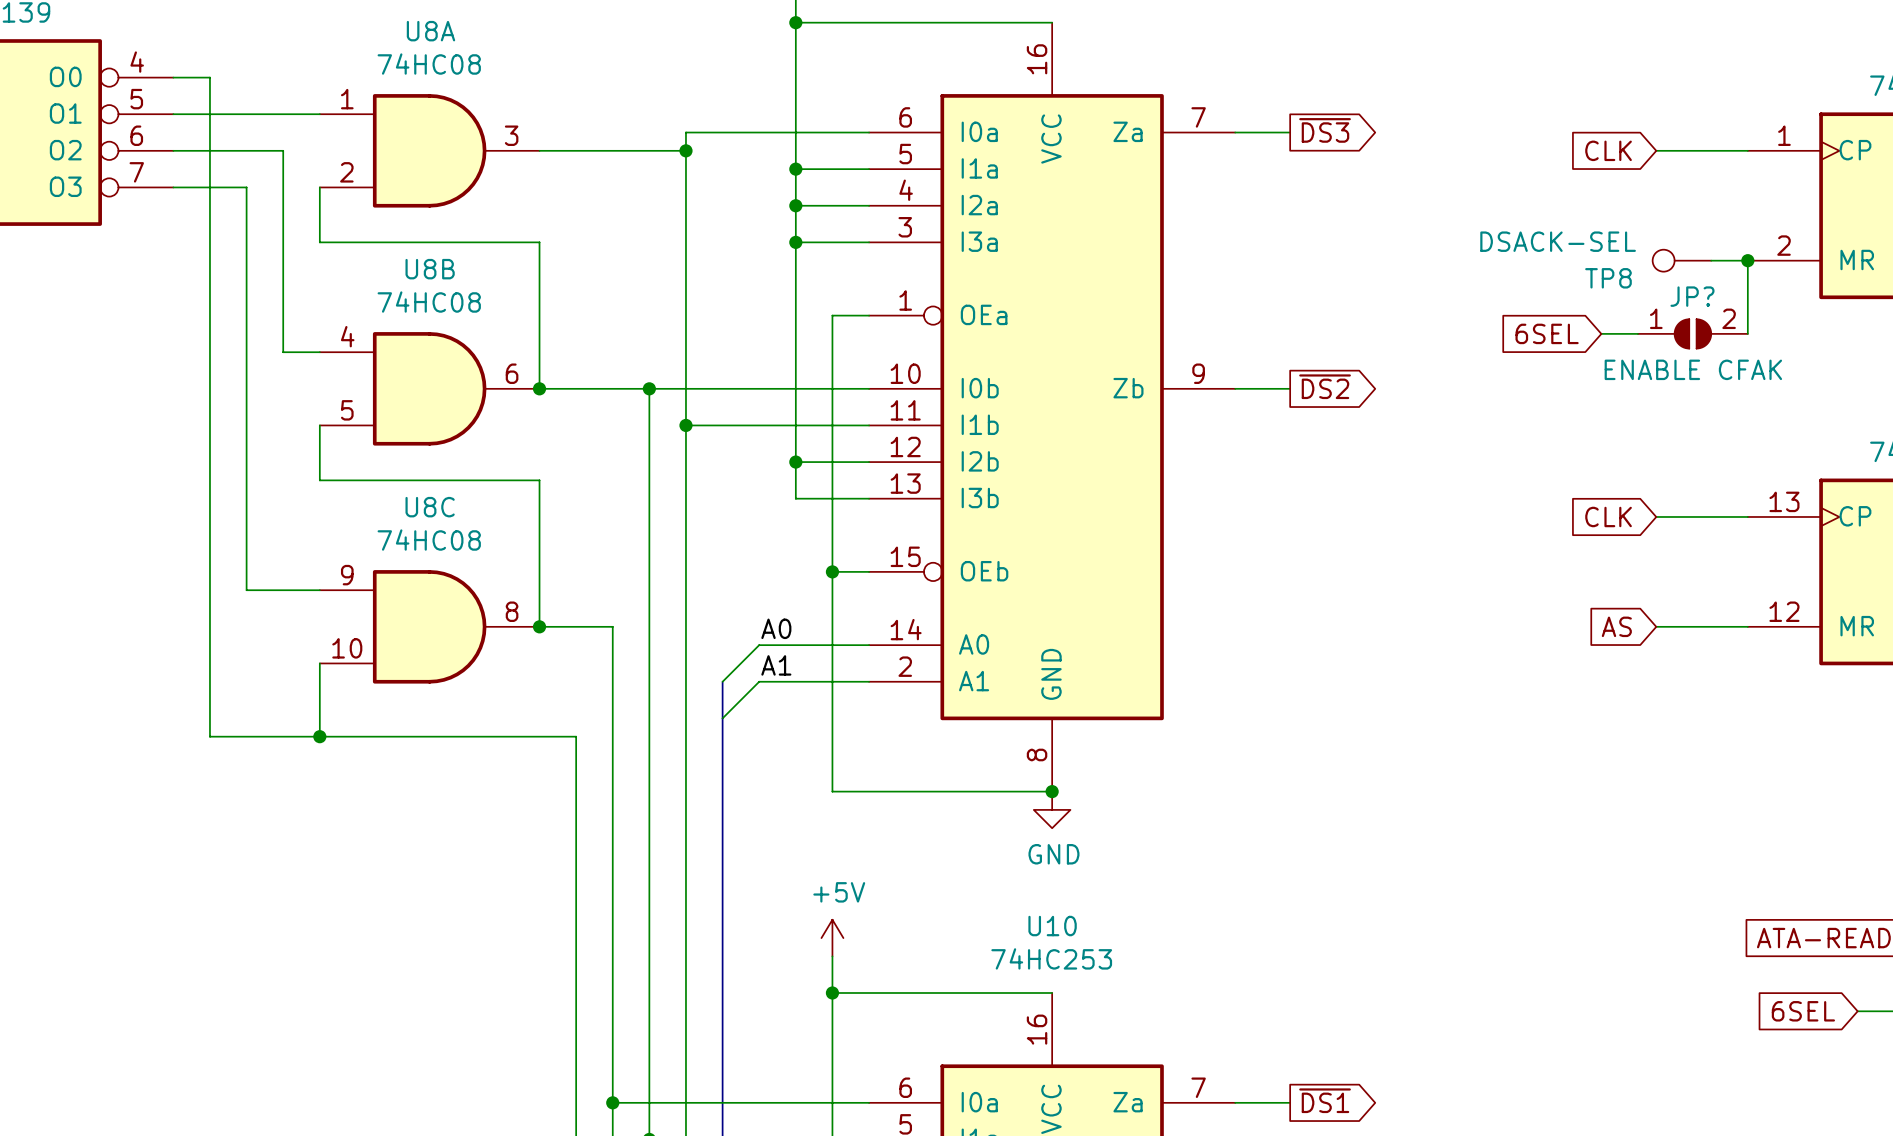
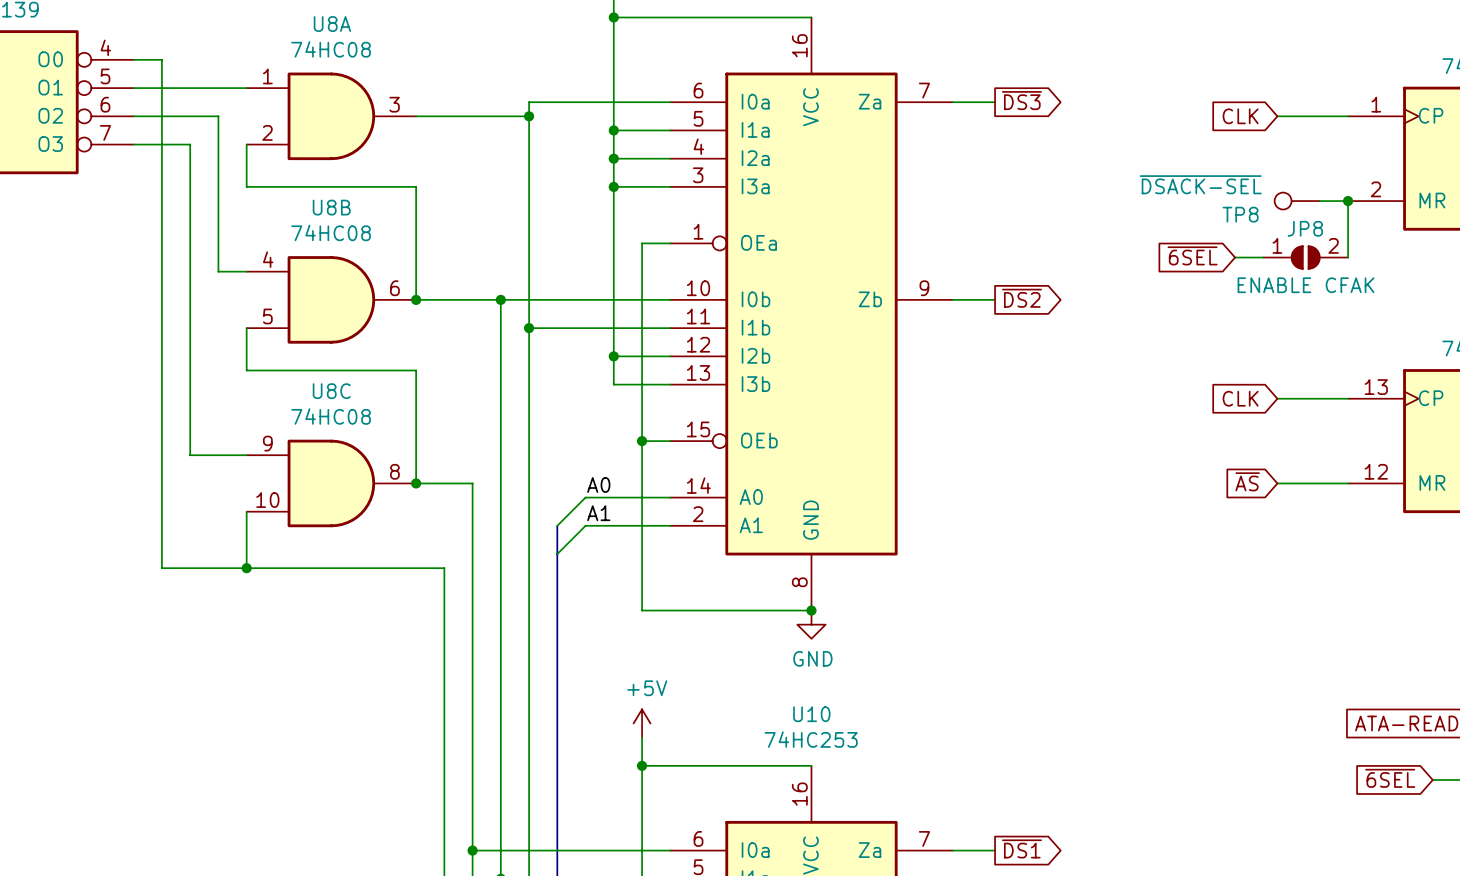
TP8 value: DSACK-SEL (1558, 241) -> ~{DSACK-SEL} (1200, 184)
JP? name: JP? (1692, 296) -> JP8 (1305, 228)
global label: 6SEL (1547, 333) -> ~{6SEL} (1192, 255)
global label: AS (1616, 626) -> ~{AS} (1247, 481)
global label: 6SEL (1803, 1011) -> ~{6SEL} (1390, 778)

